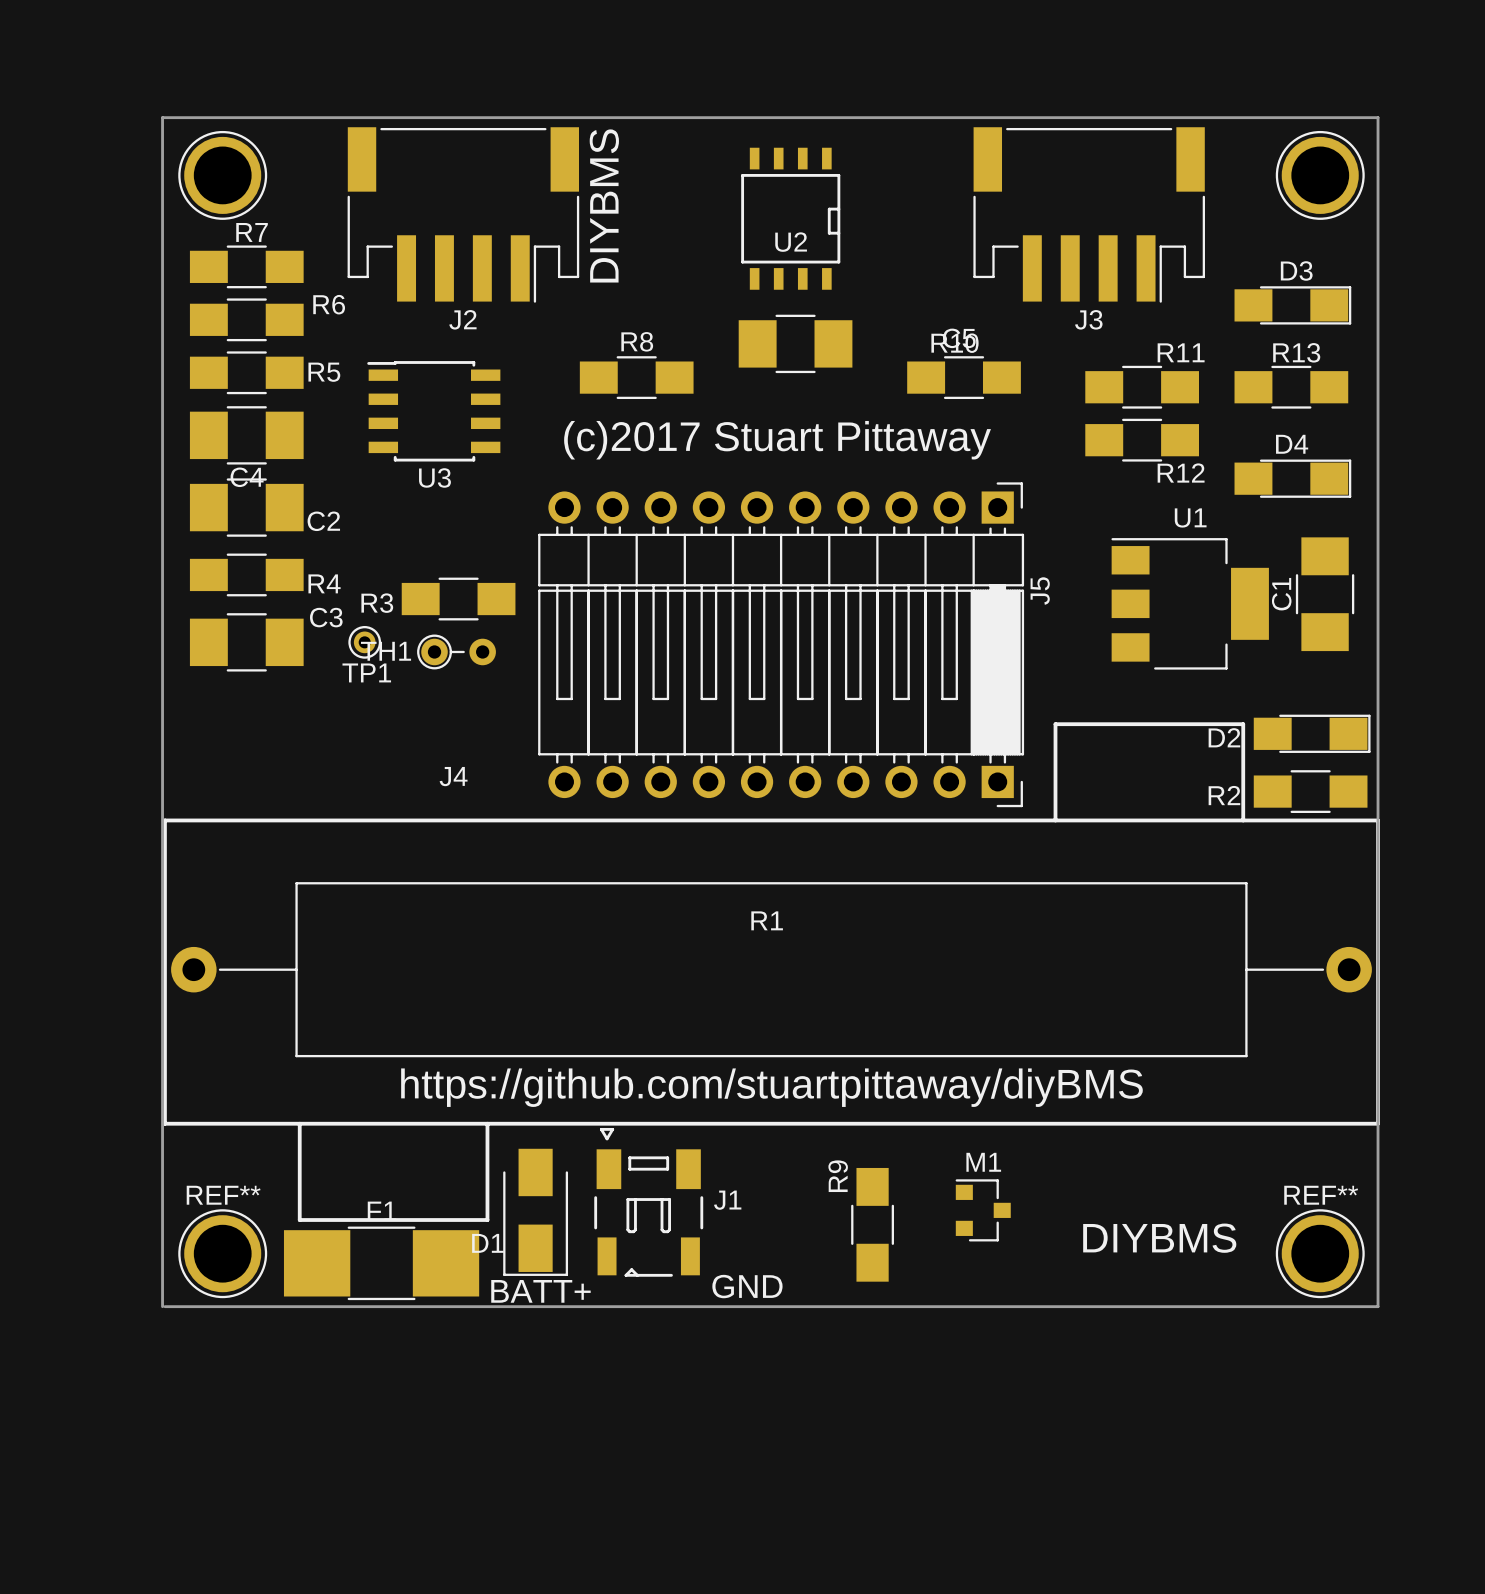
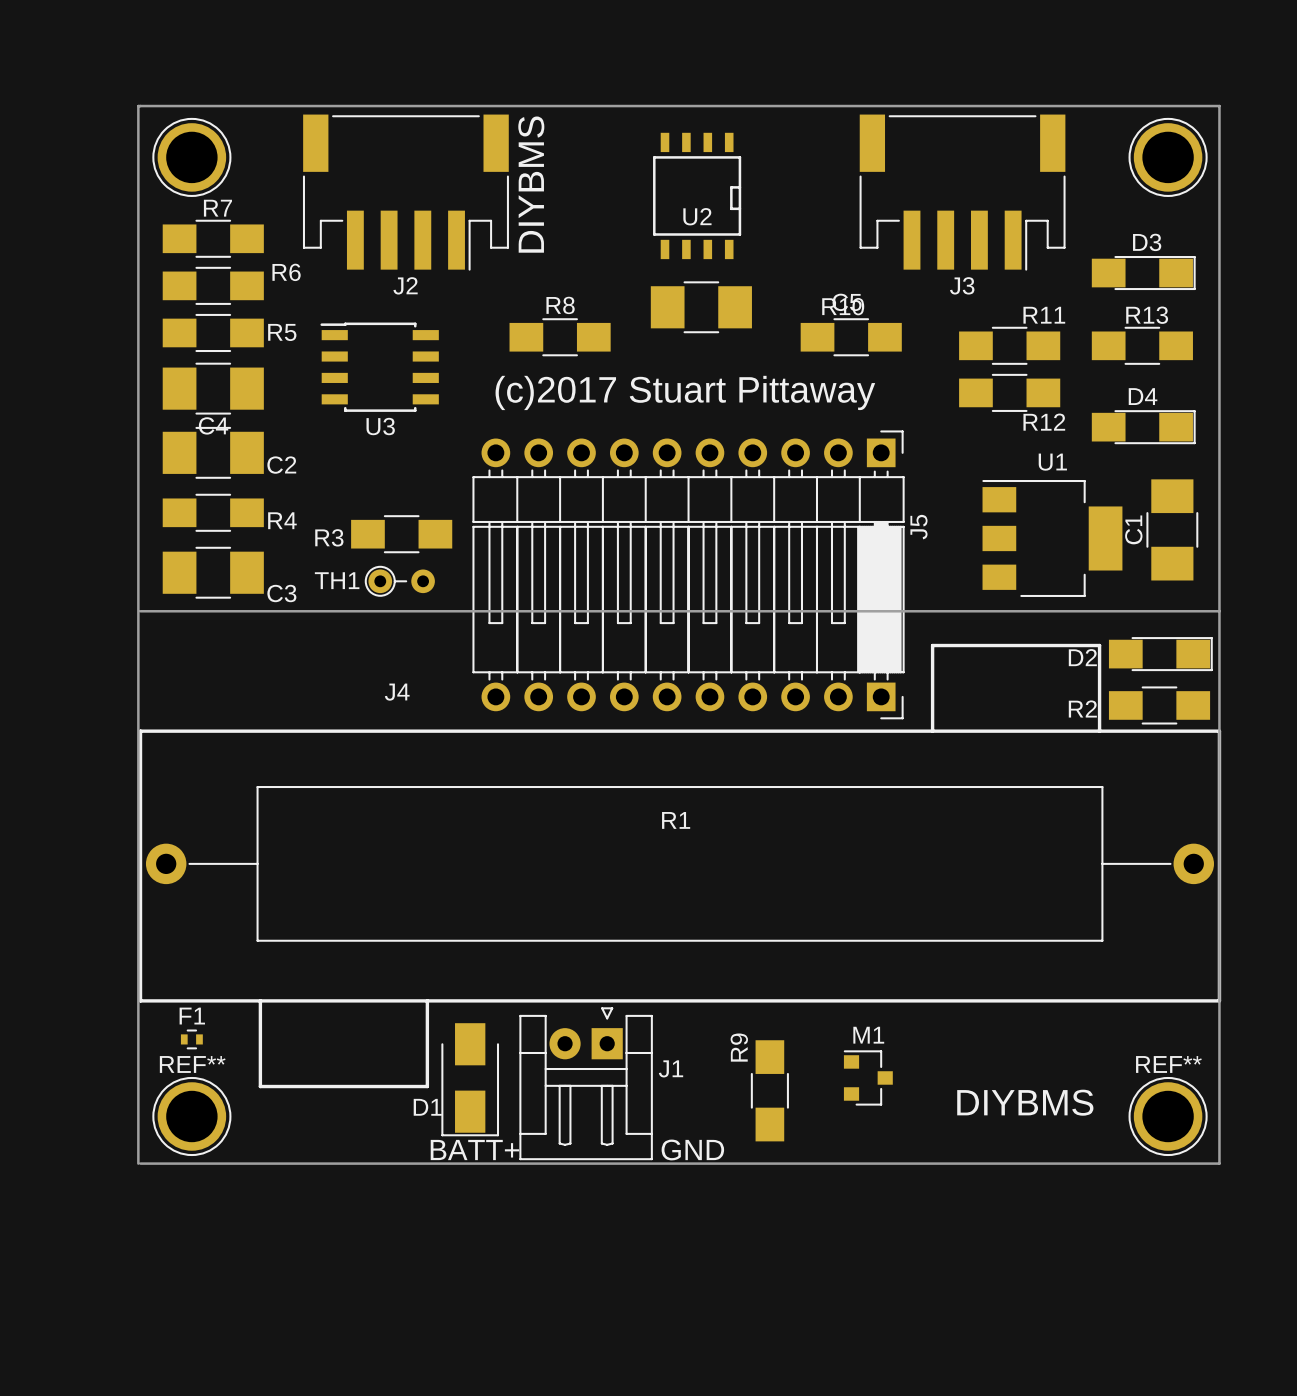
C3 name position: C3 (326, 617) -> C3 (281, 593)
TP1: (364, 642) -> none
board edge: none -> (140, 611) (1219, 611)
text: https://github.com/stuartpittaway/diyBMS (771, 1087) -> none
J1 footprint: [594, 1127, 704, 1277] -> [519, 1007, 653, 1161]
F1 footprint: [283, 1226, 480, 1301] -> [180, 1029, 203, 1050]
text position: GND (747, 1286) -> GND (692, 1149)

